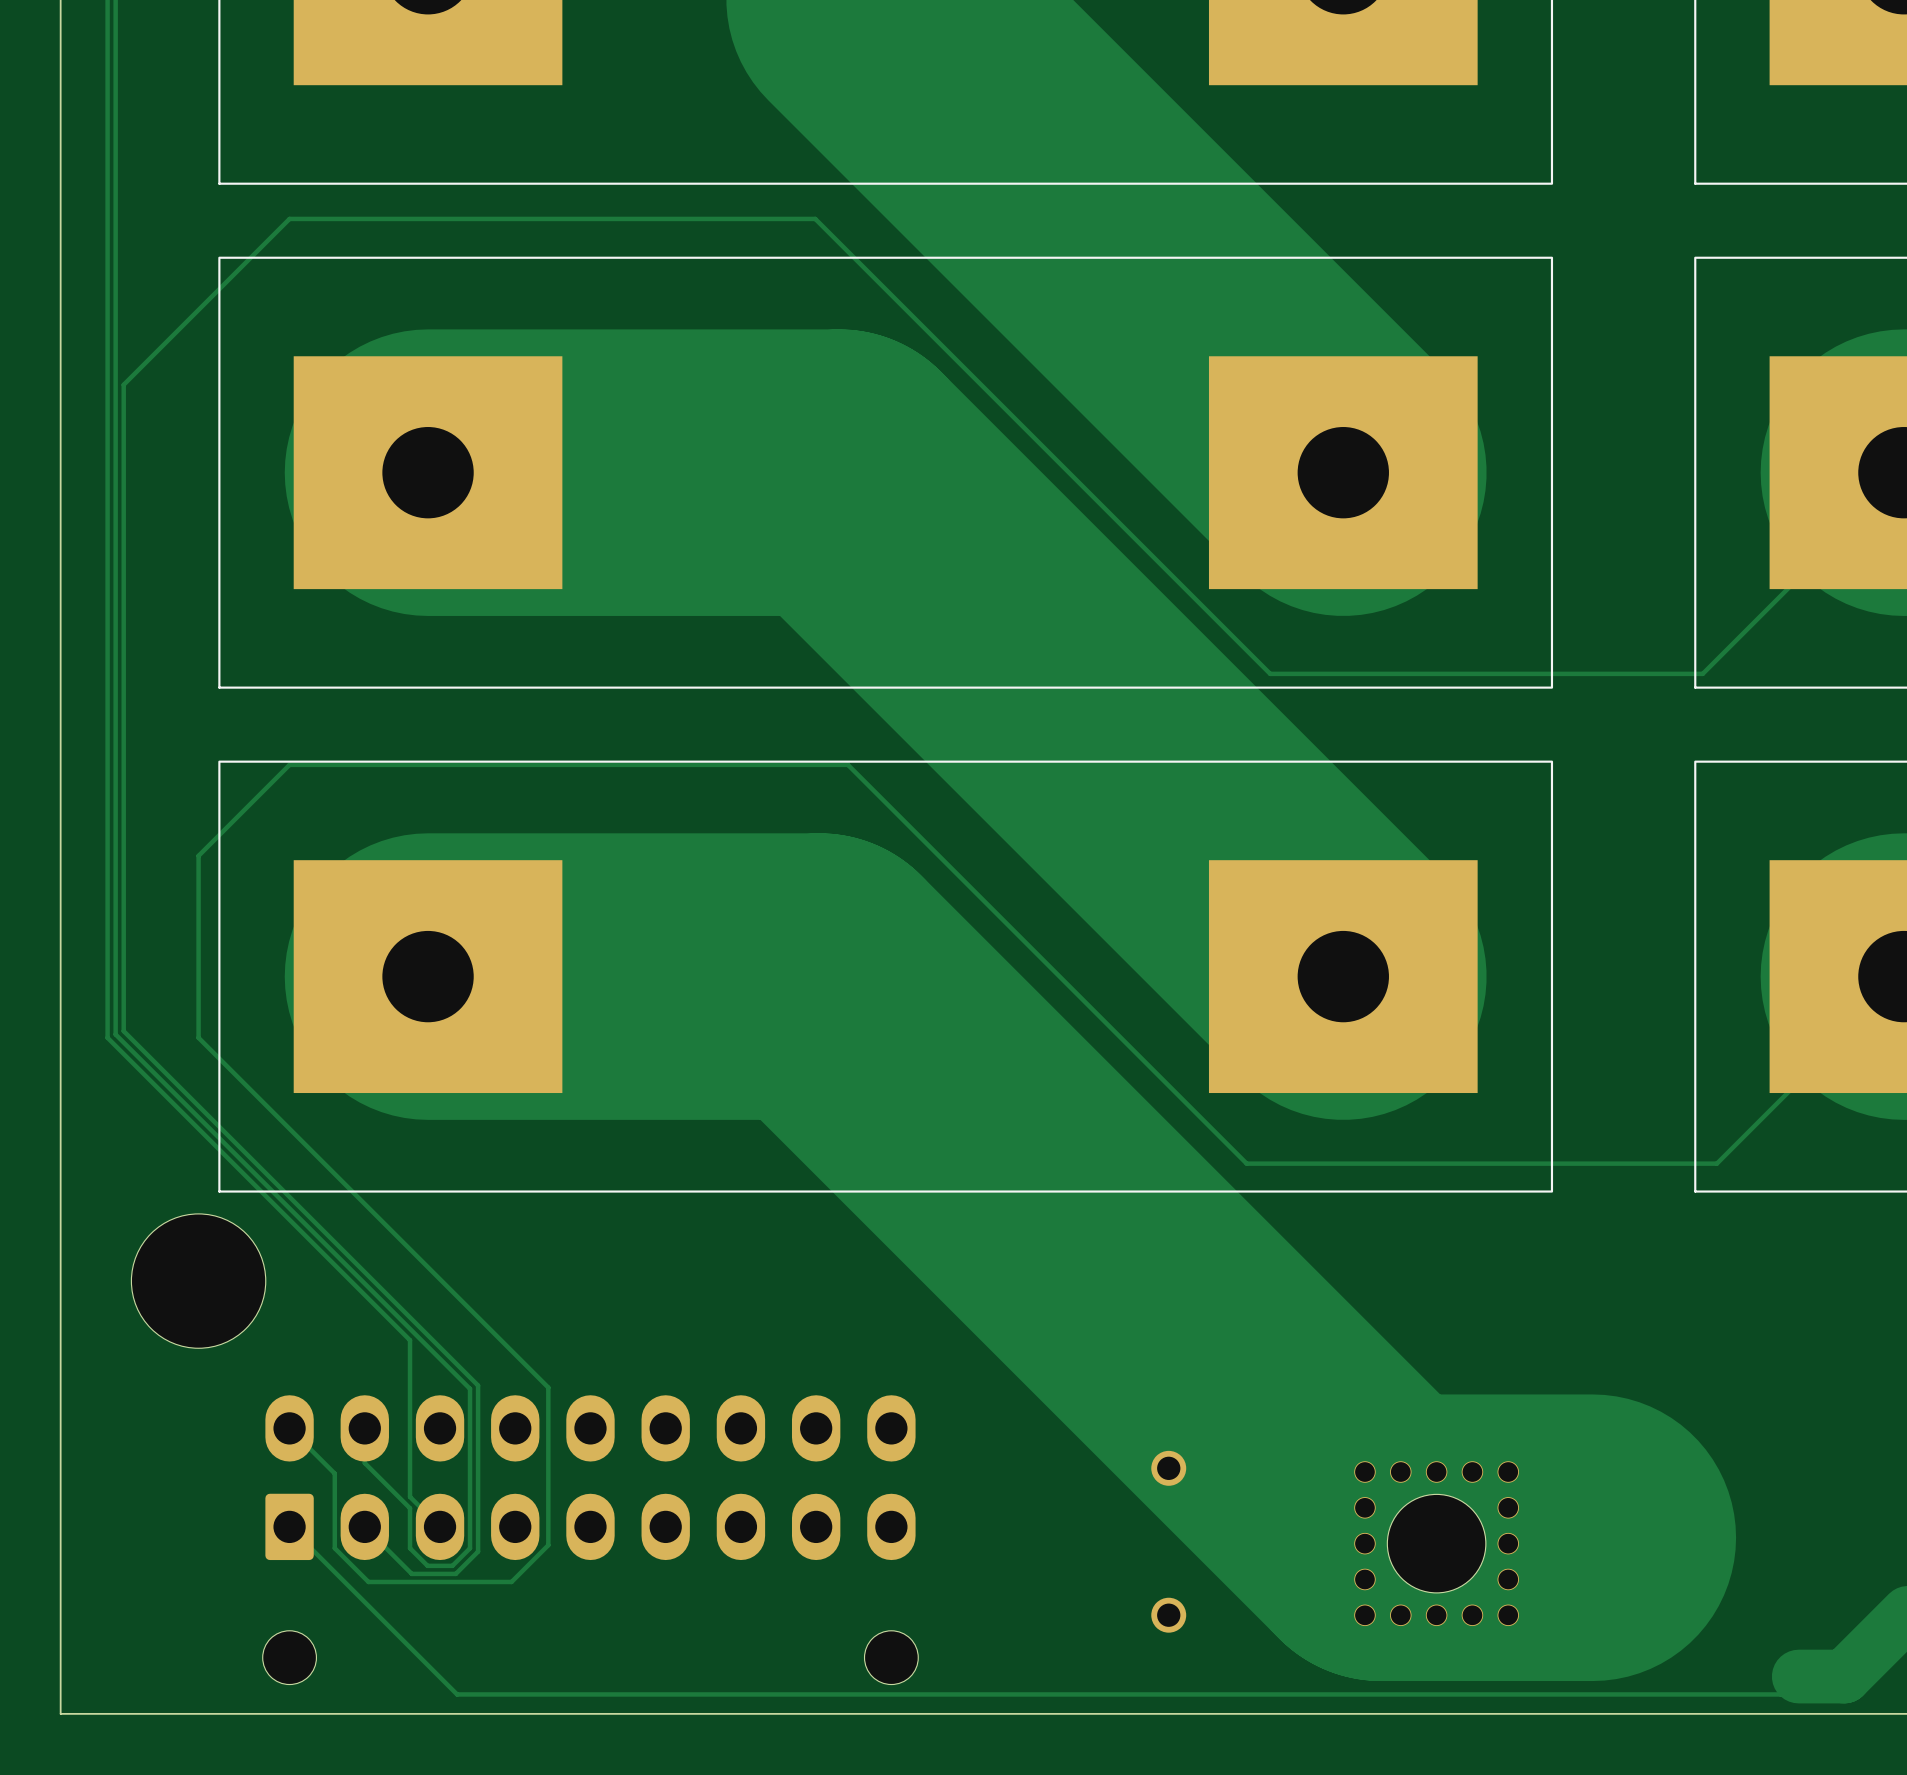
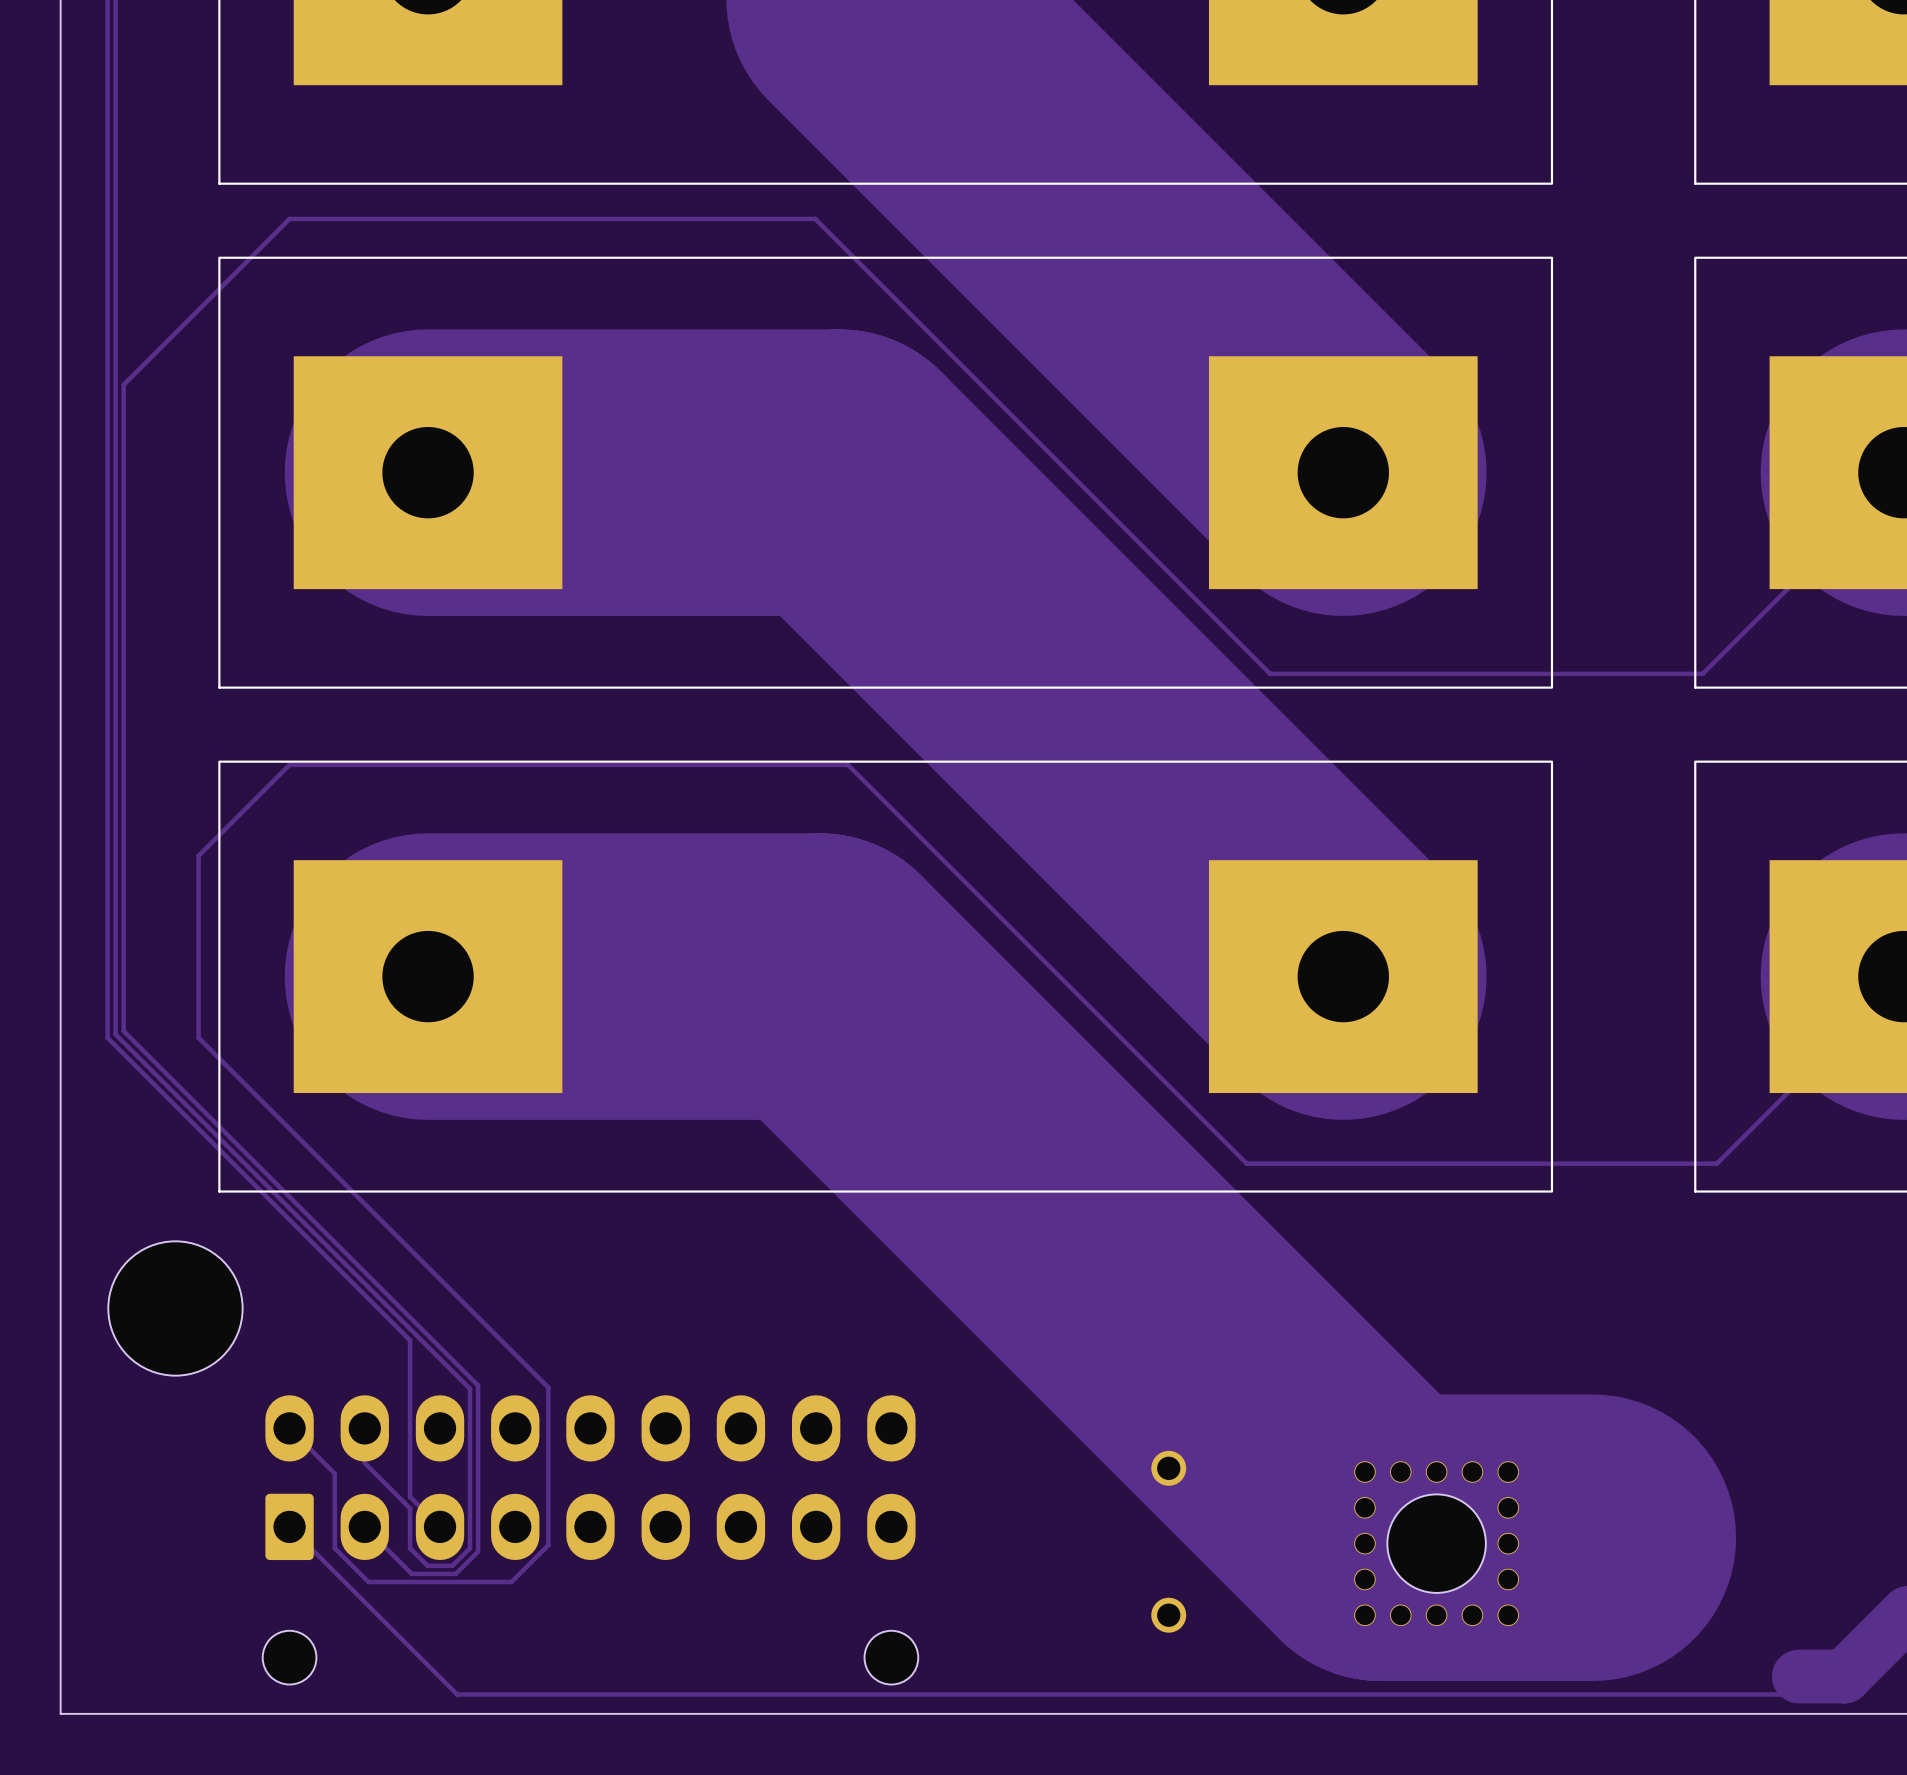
part position: (198, 1281) -> (175, 1308)

